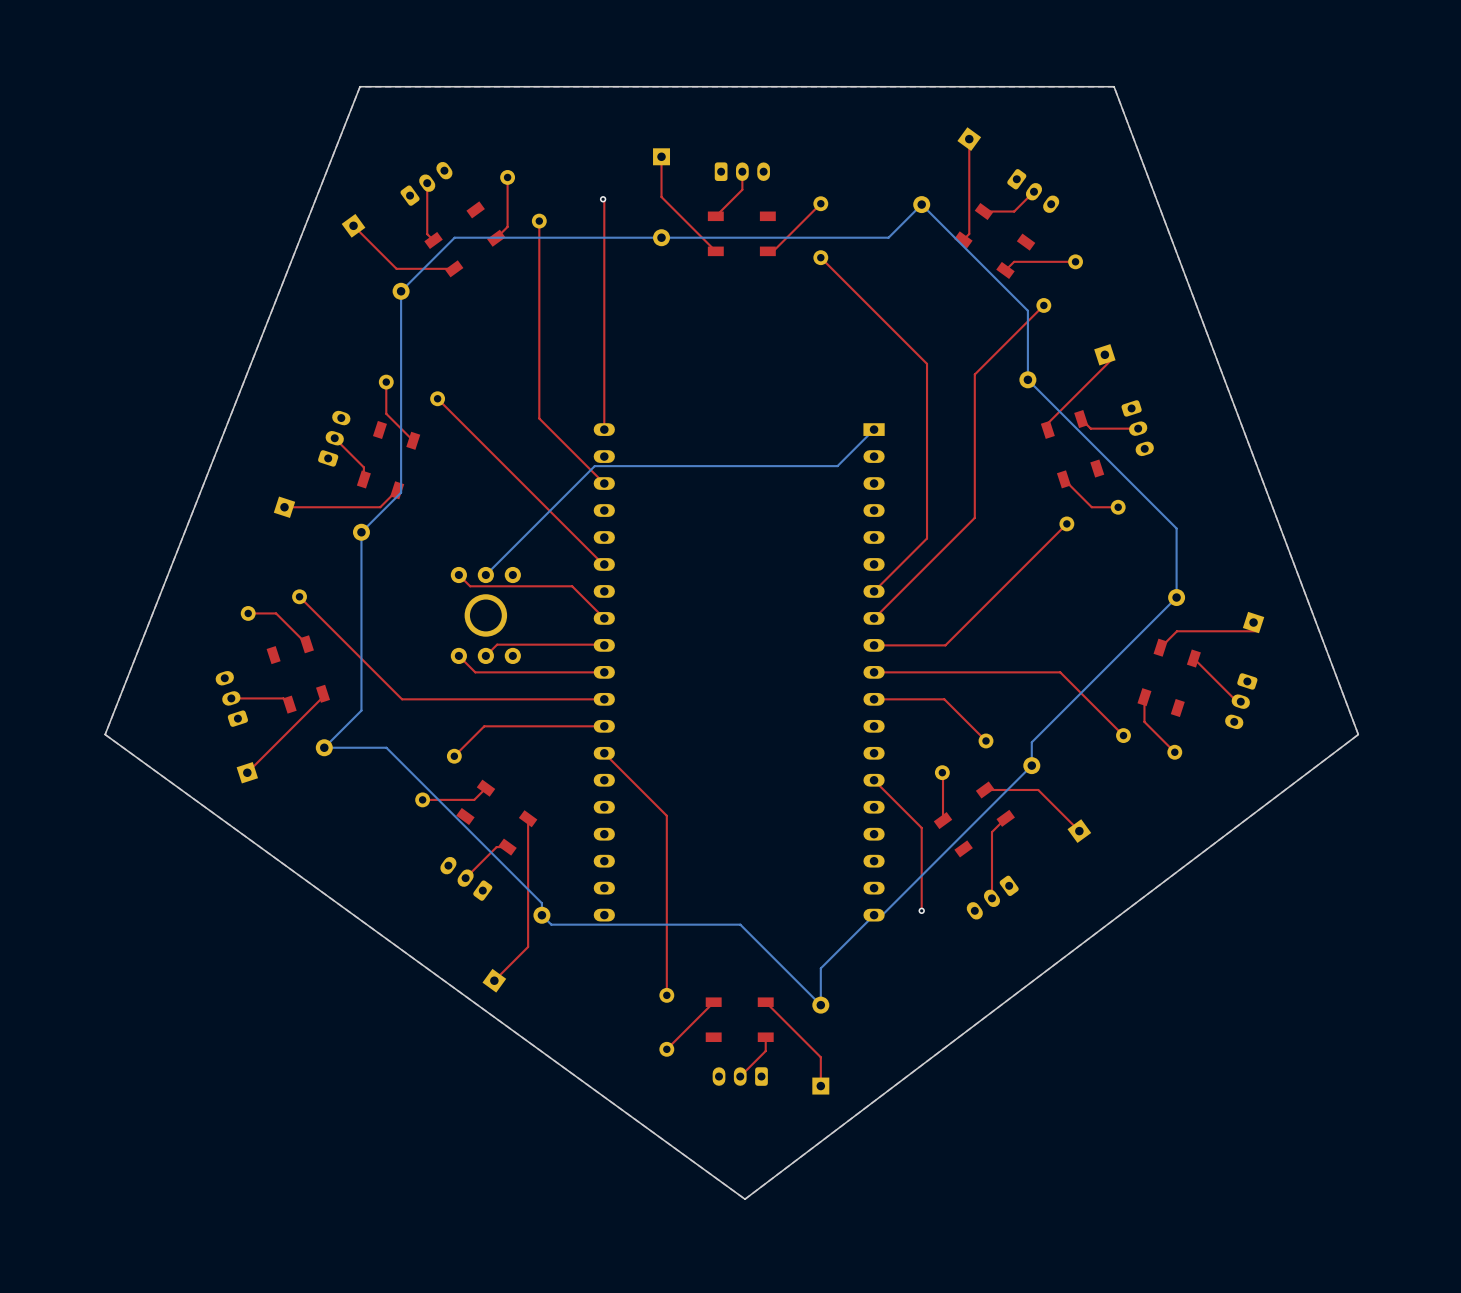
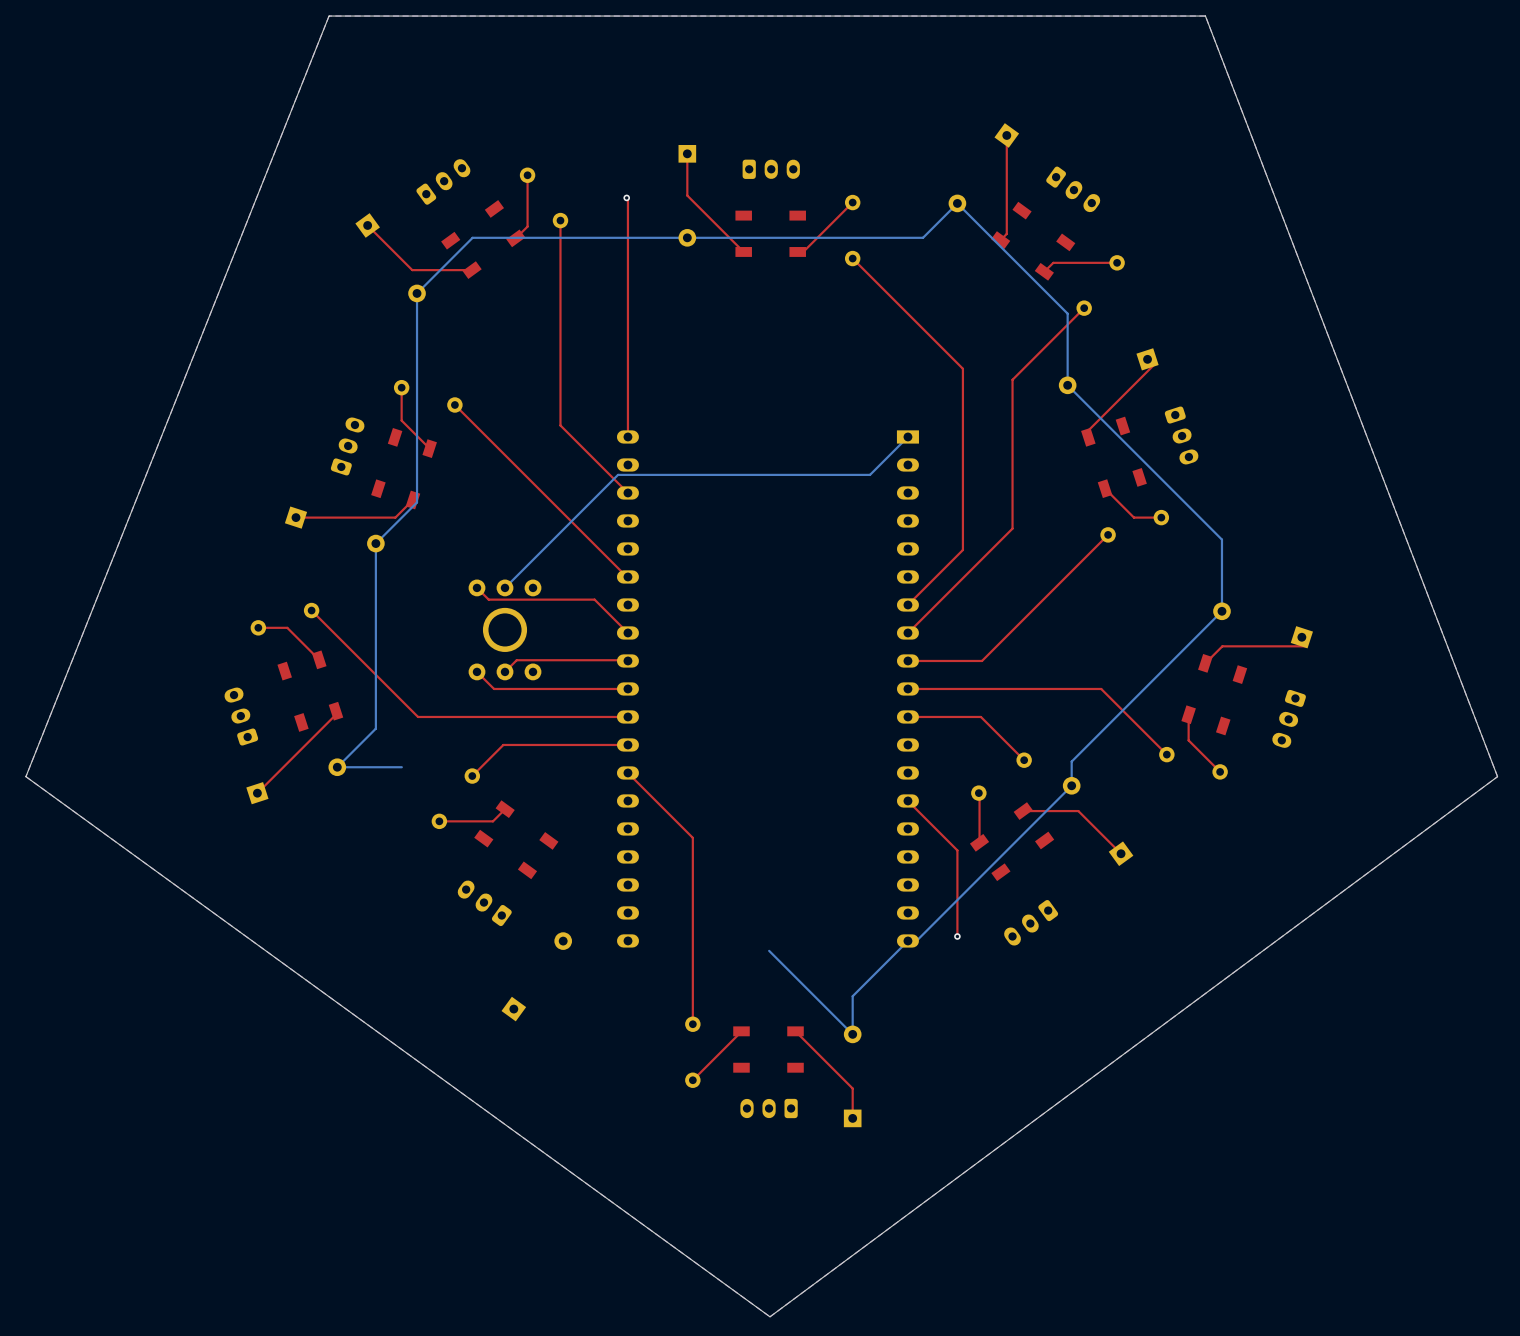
board edge: (1114, 86) (1358, 734) (745, 1199) (105, 734) (360, 86) (1114, 86) -> (1205, 16) (1497, 776) (770, 1316) (25, 776) (329, 16) (1205, 16)
top track: (742, 171) (742, 189) (715, 216) -> none
top track: (427, 183) (427, 234) (433, 240) -> none
top track: (1033, 191) (1014, 211) (983, 211) -> none
top track: (1081, 419) (1090, 428) (1138, 428) -> none
top track: (334, 438) (363, 467) (363, 479) -> none
top track: (1193, 658) (1237, 701) -> none
top track: (231, 698) (283, 698) (289, 704) -> none
bottom track: (386, 747) (541, 903) (541, 915) (551, 924) (740, 924) -> none
top track: (528, 818) (528, 946) (494, 980) -> none
top track: (1005, 818) (991, 832) (991, 898) -> none
top track: (507, 847) (496, 847) (465, 878) -> none
top track: (765, 1037) (765, 1051) (740, 1076) -> none

